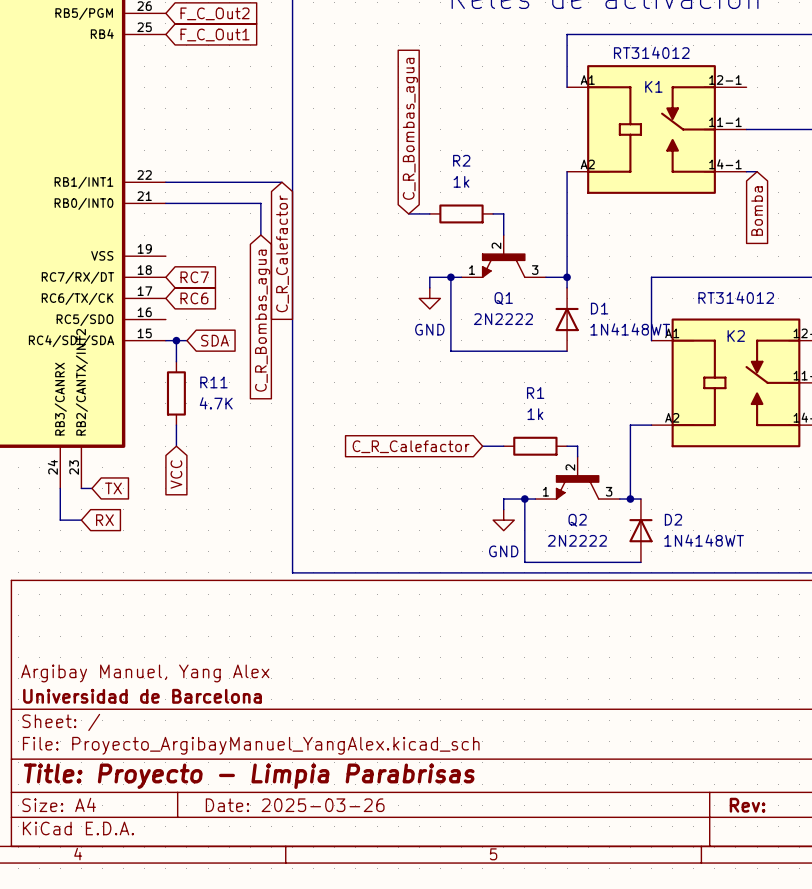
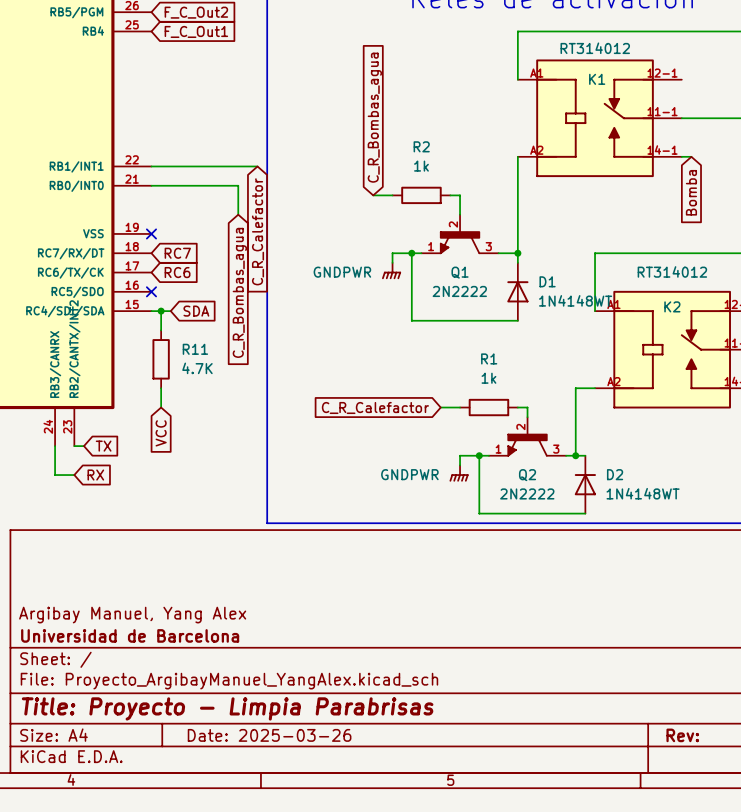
no-connect mark: none -> (151, 233)
power symbol: GND (429, 298) -> GNDPWR (391, 270)
no-connect mark: none -> (151, 291)
power symbol: GND (503, 520) -> GNDPWR (459, 473)

